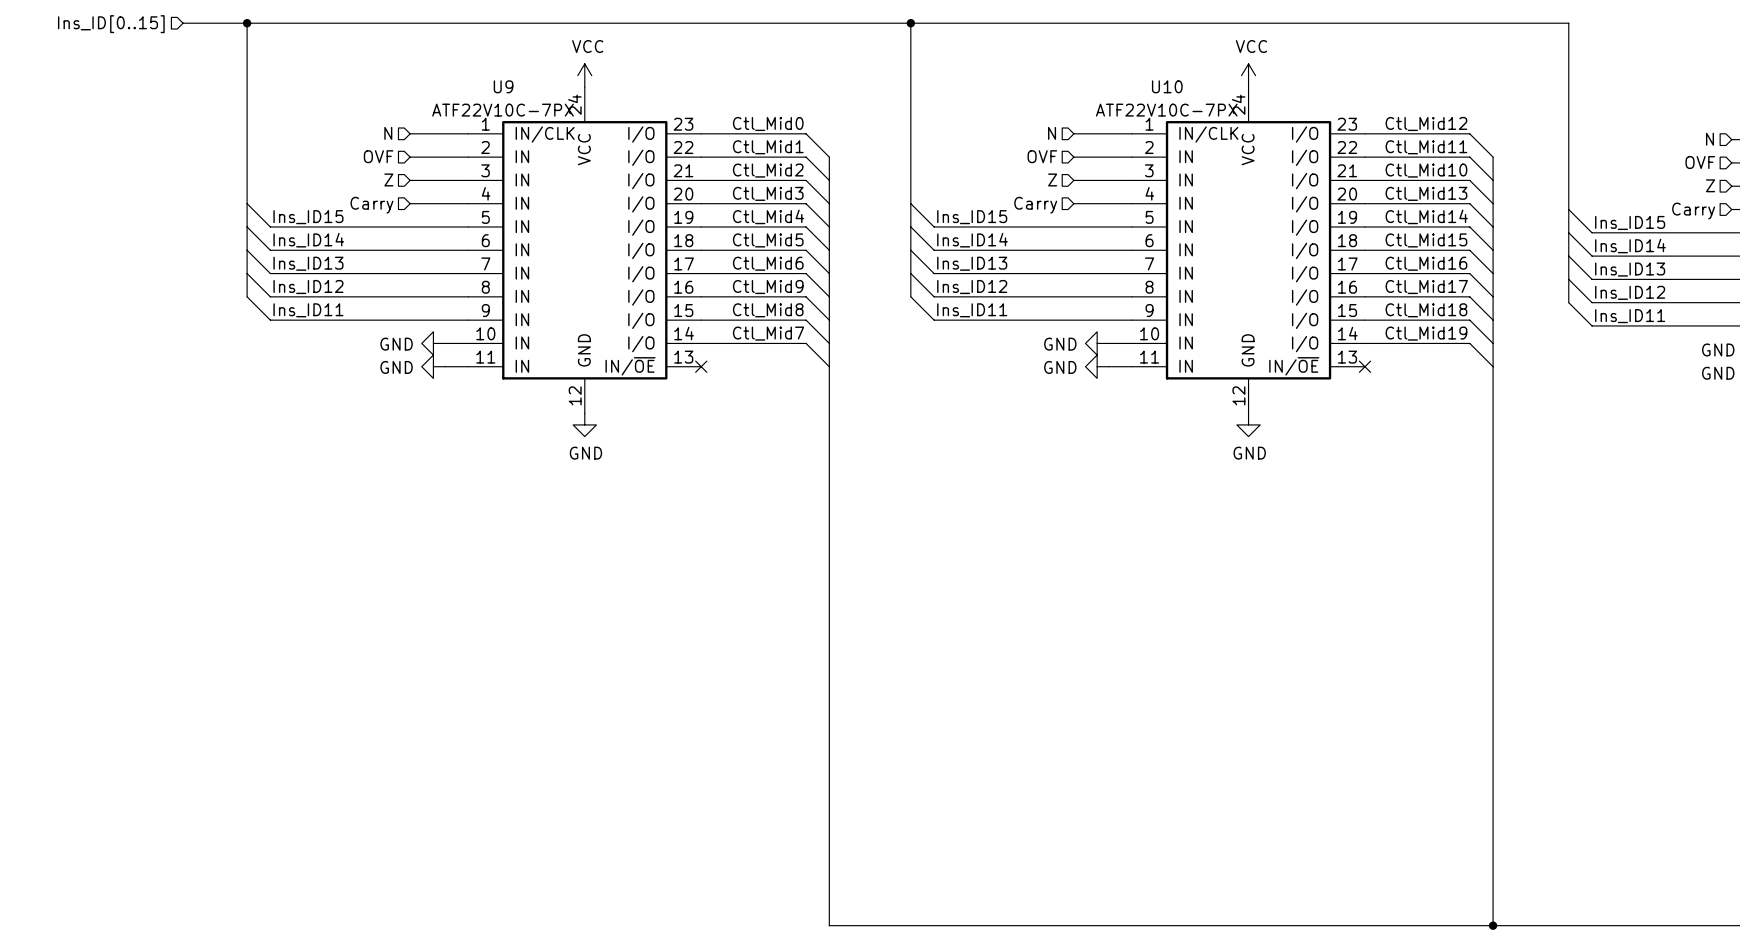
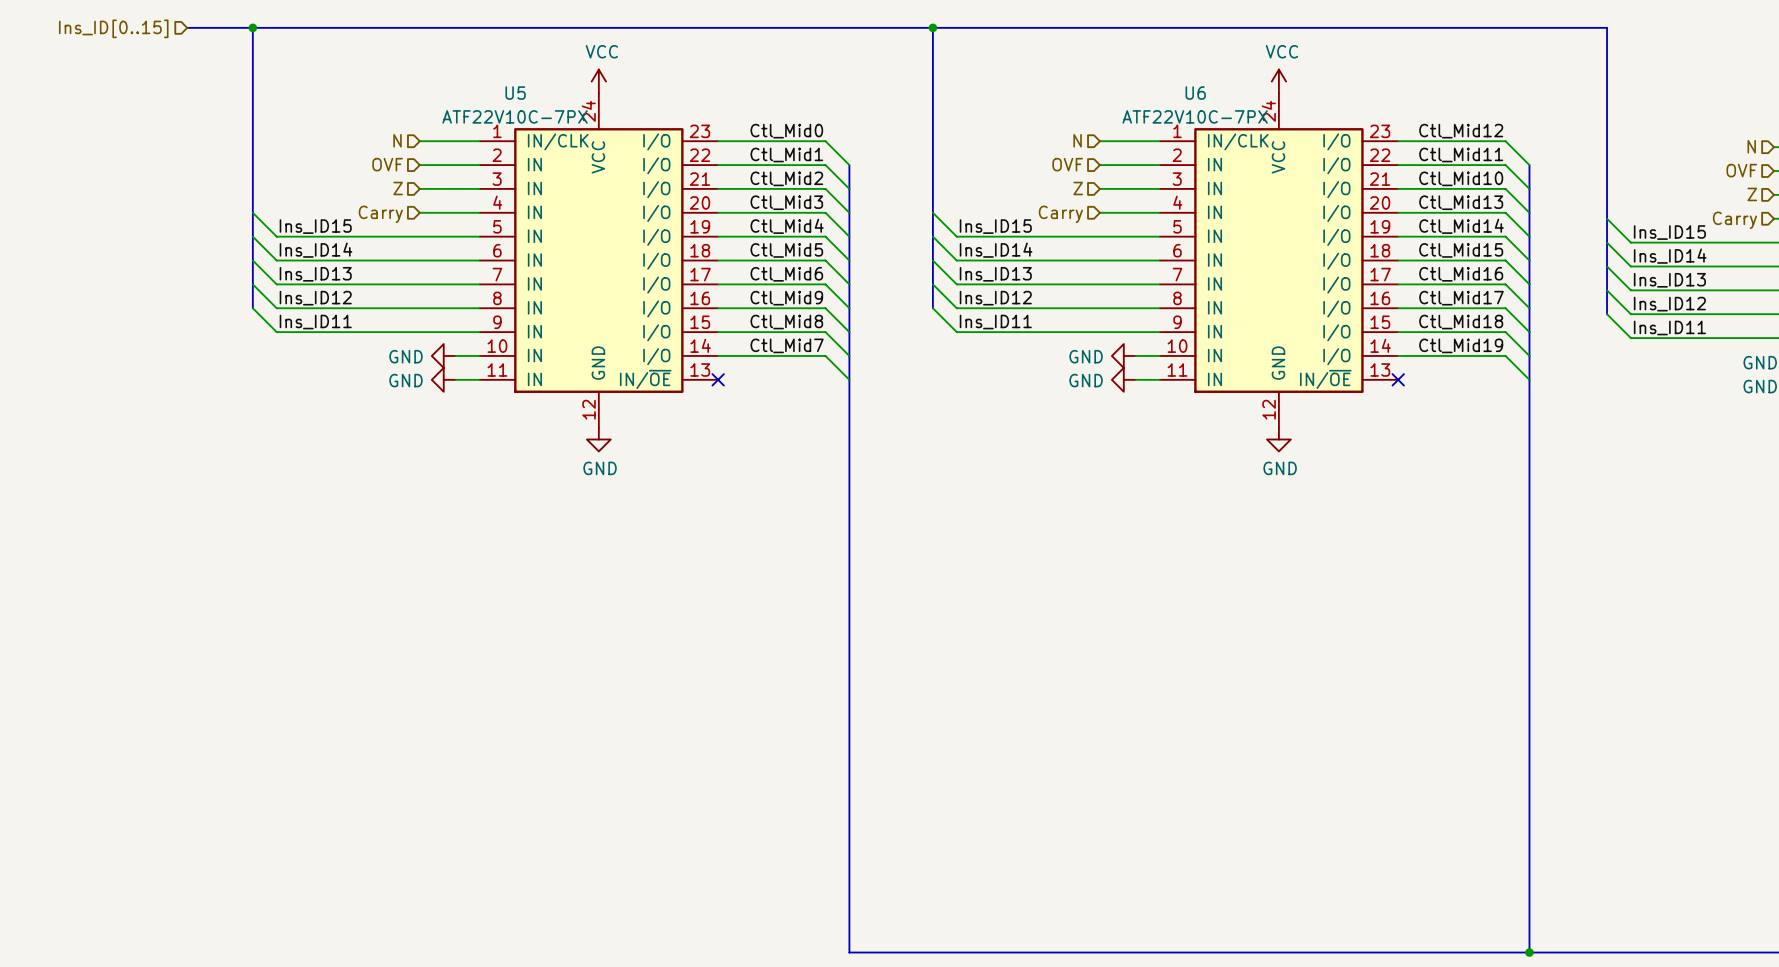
U9 name: U9 (503, 86) -> U5 (515, 93)
U10 name: U10 (1167, 86) -> U6 (1195, 93)

